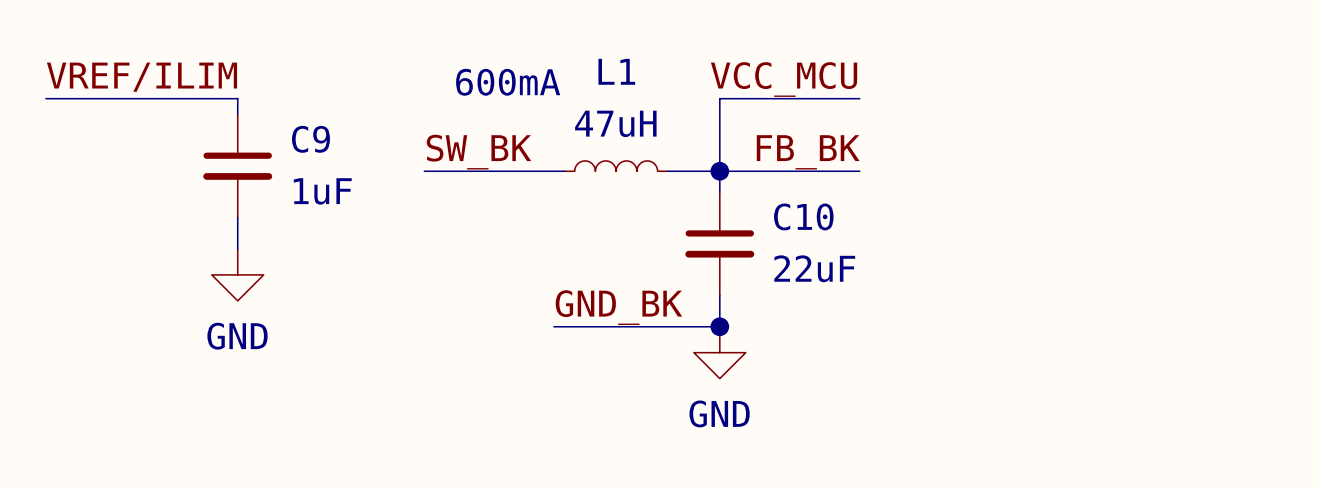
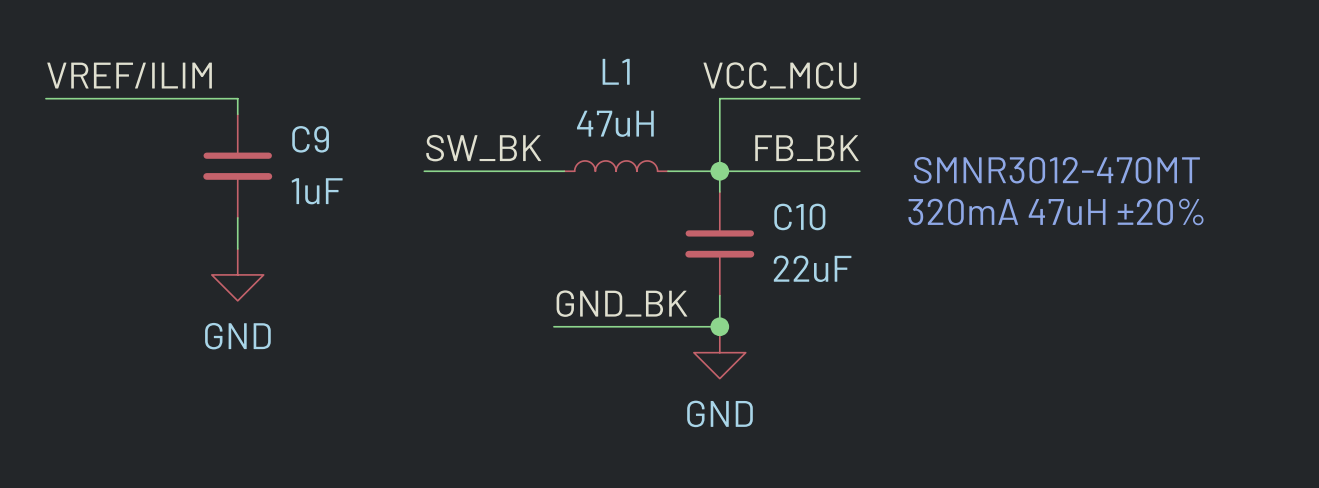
text: 600mA (508, 82) -> none
text: none -> SMNR3012-470MT (1056, 170)
text: none -> 320mA 47uH ±20% (1055, 211)

